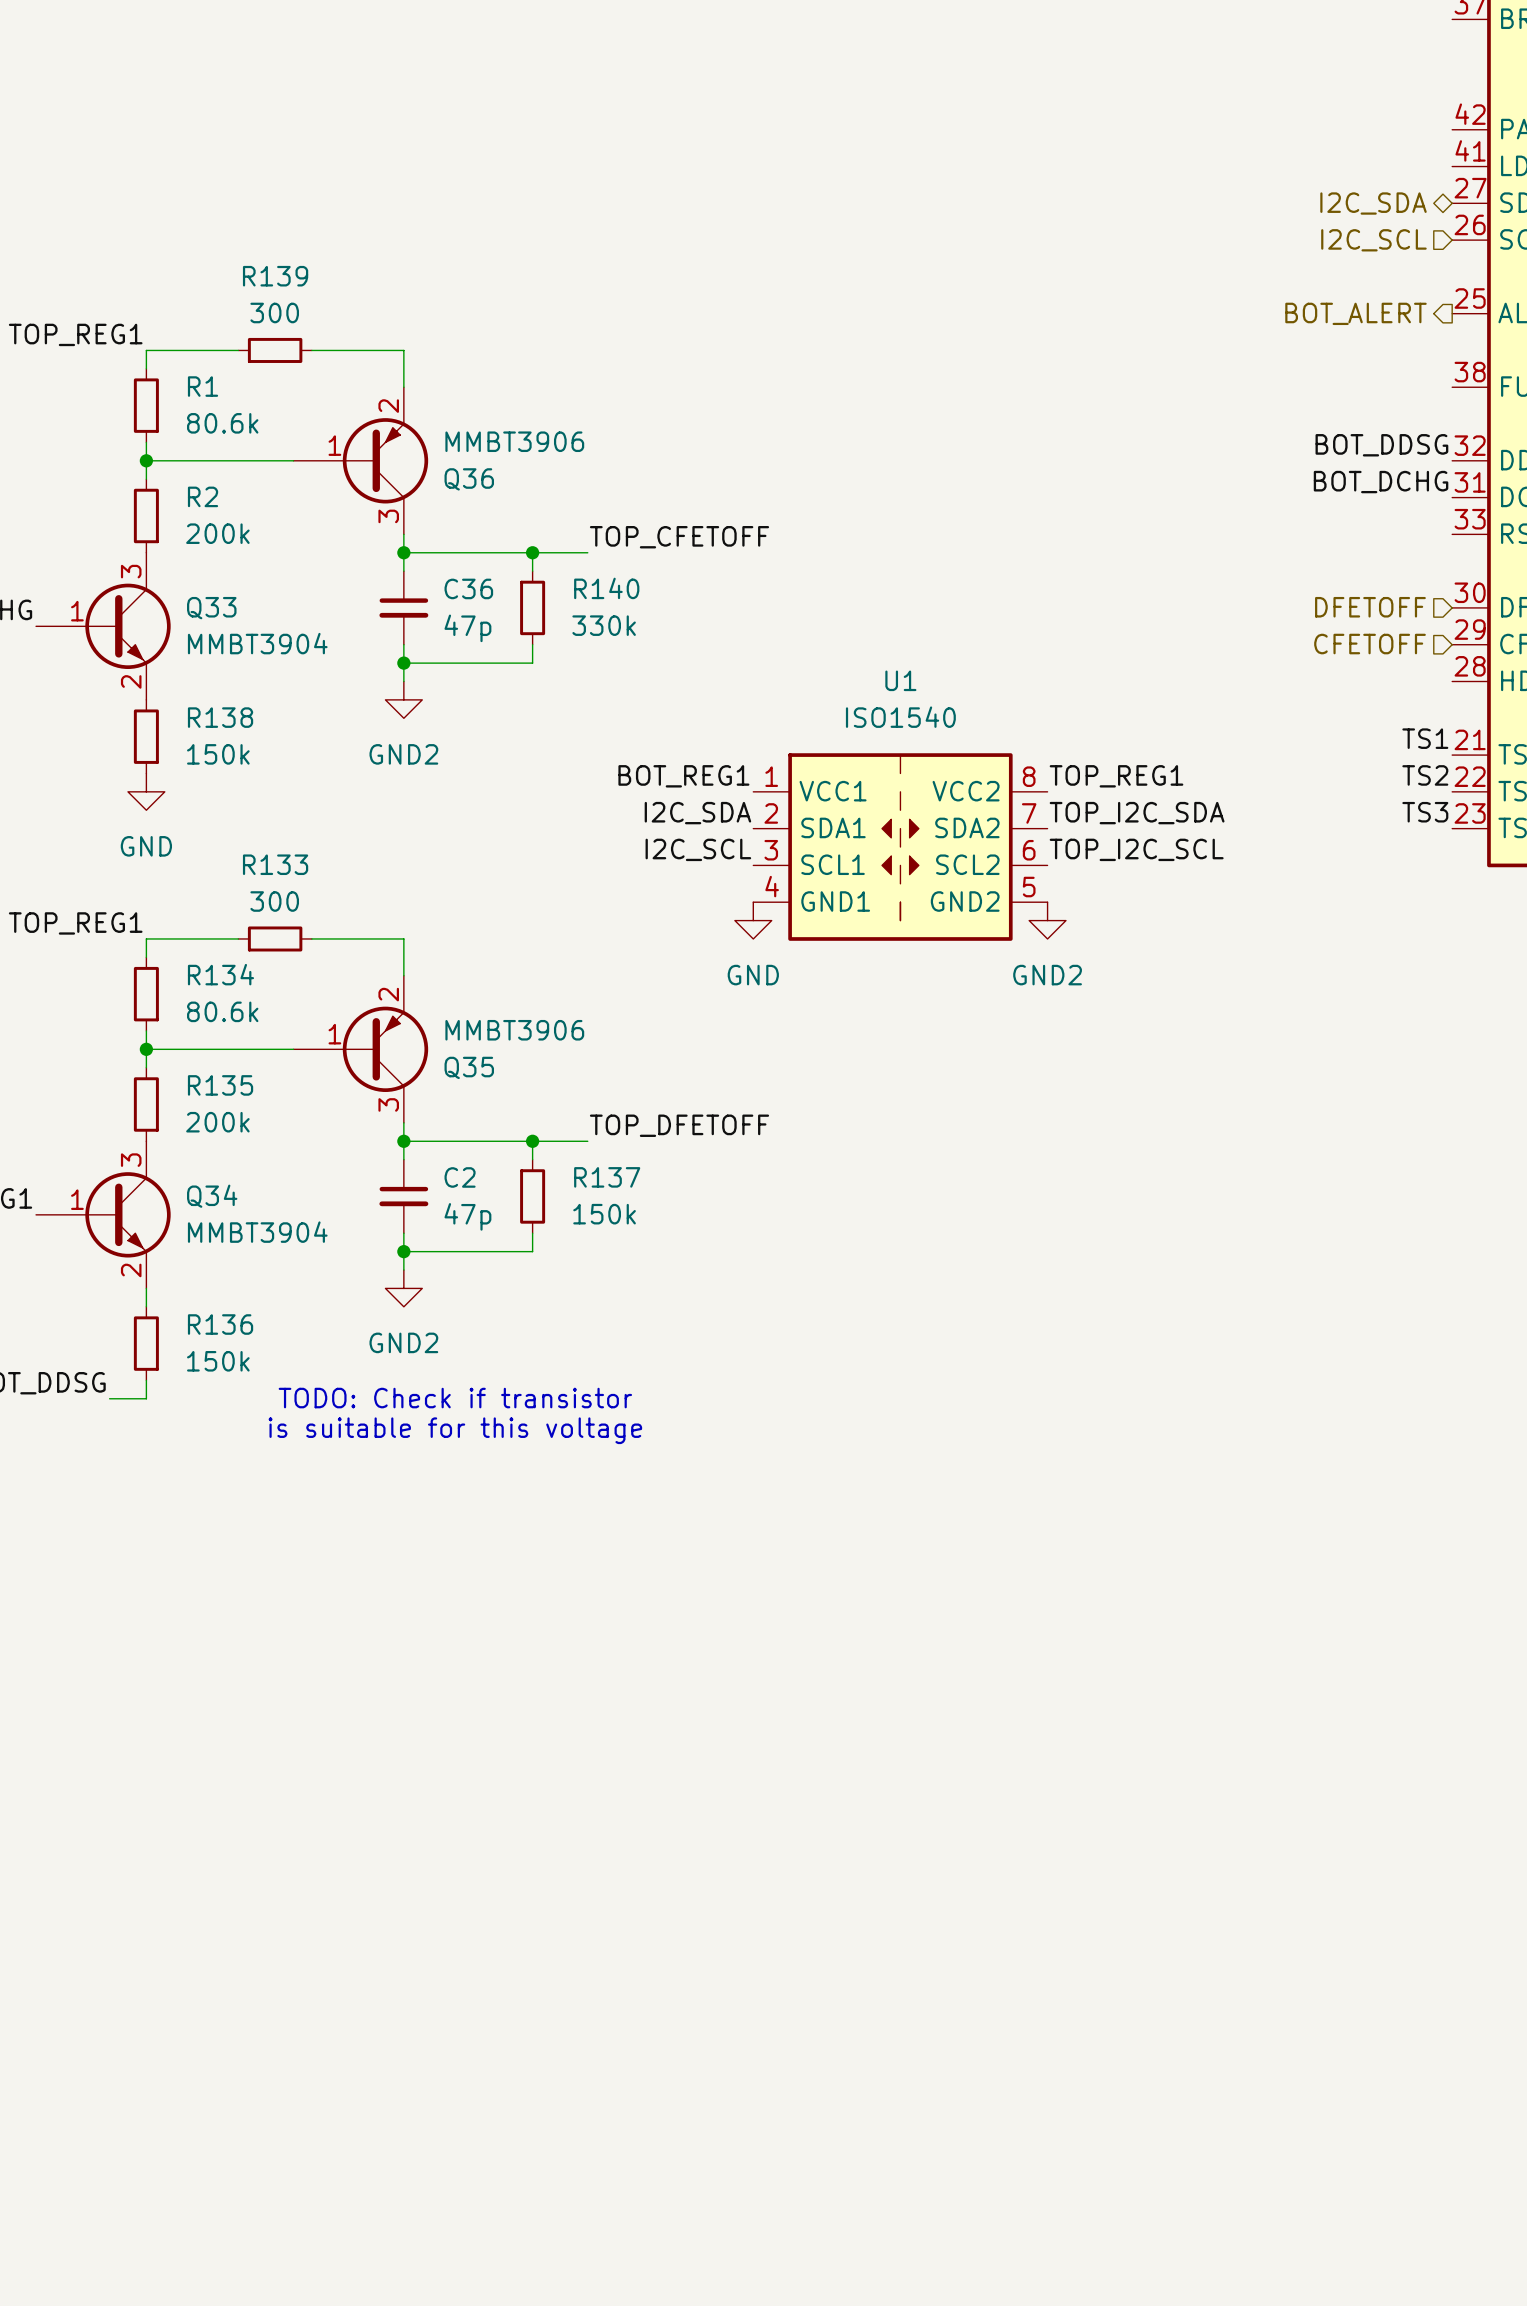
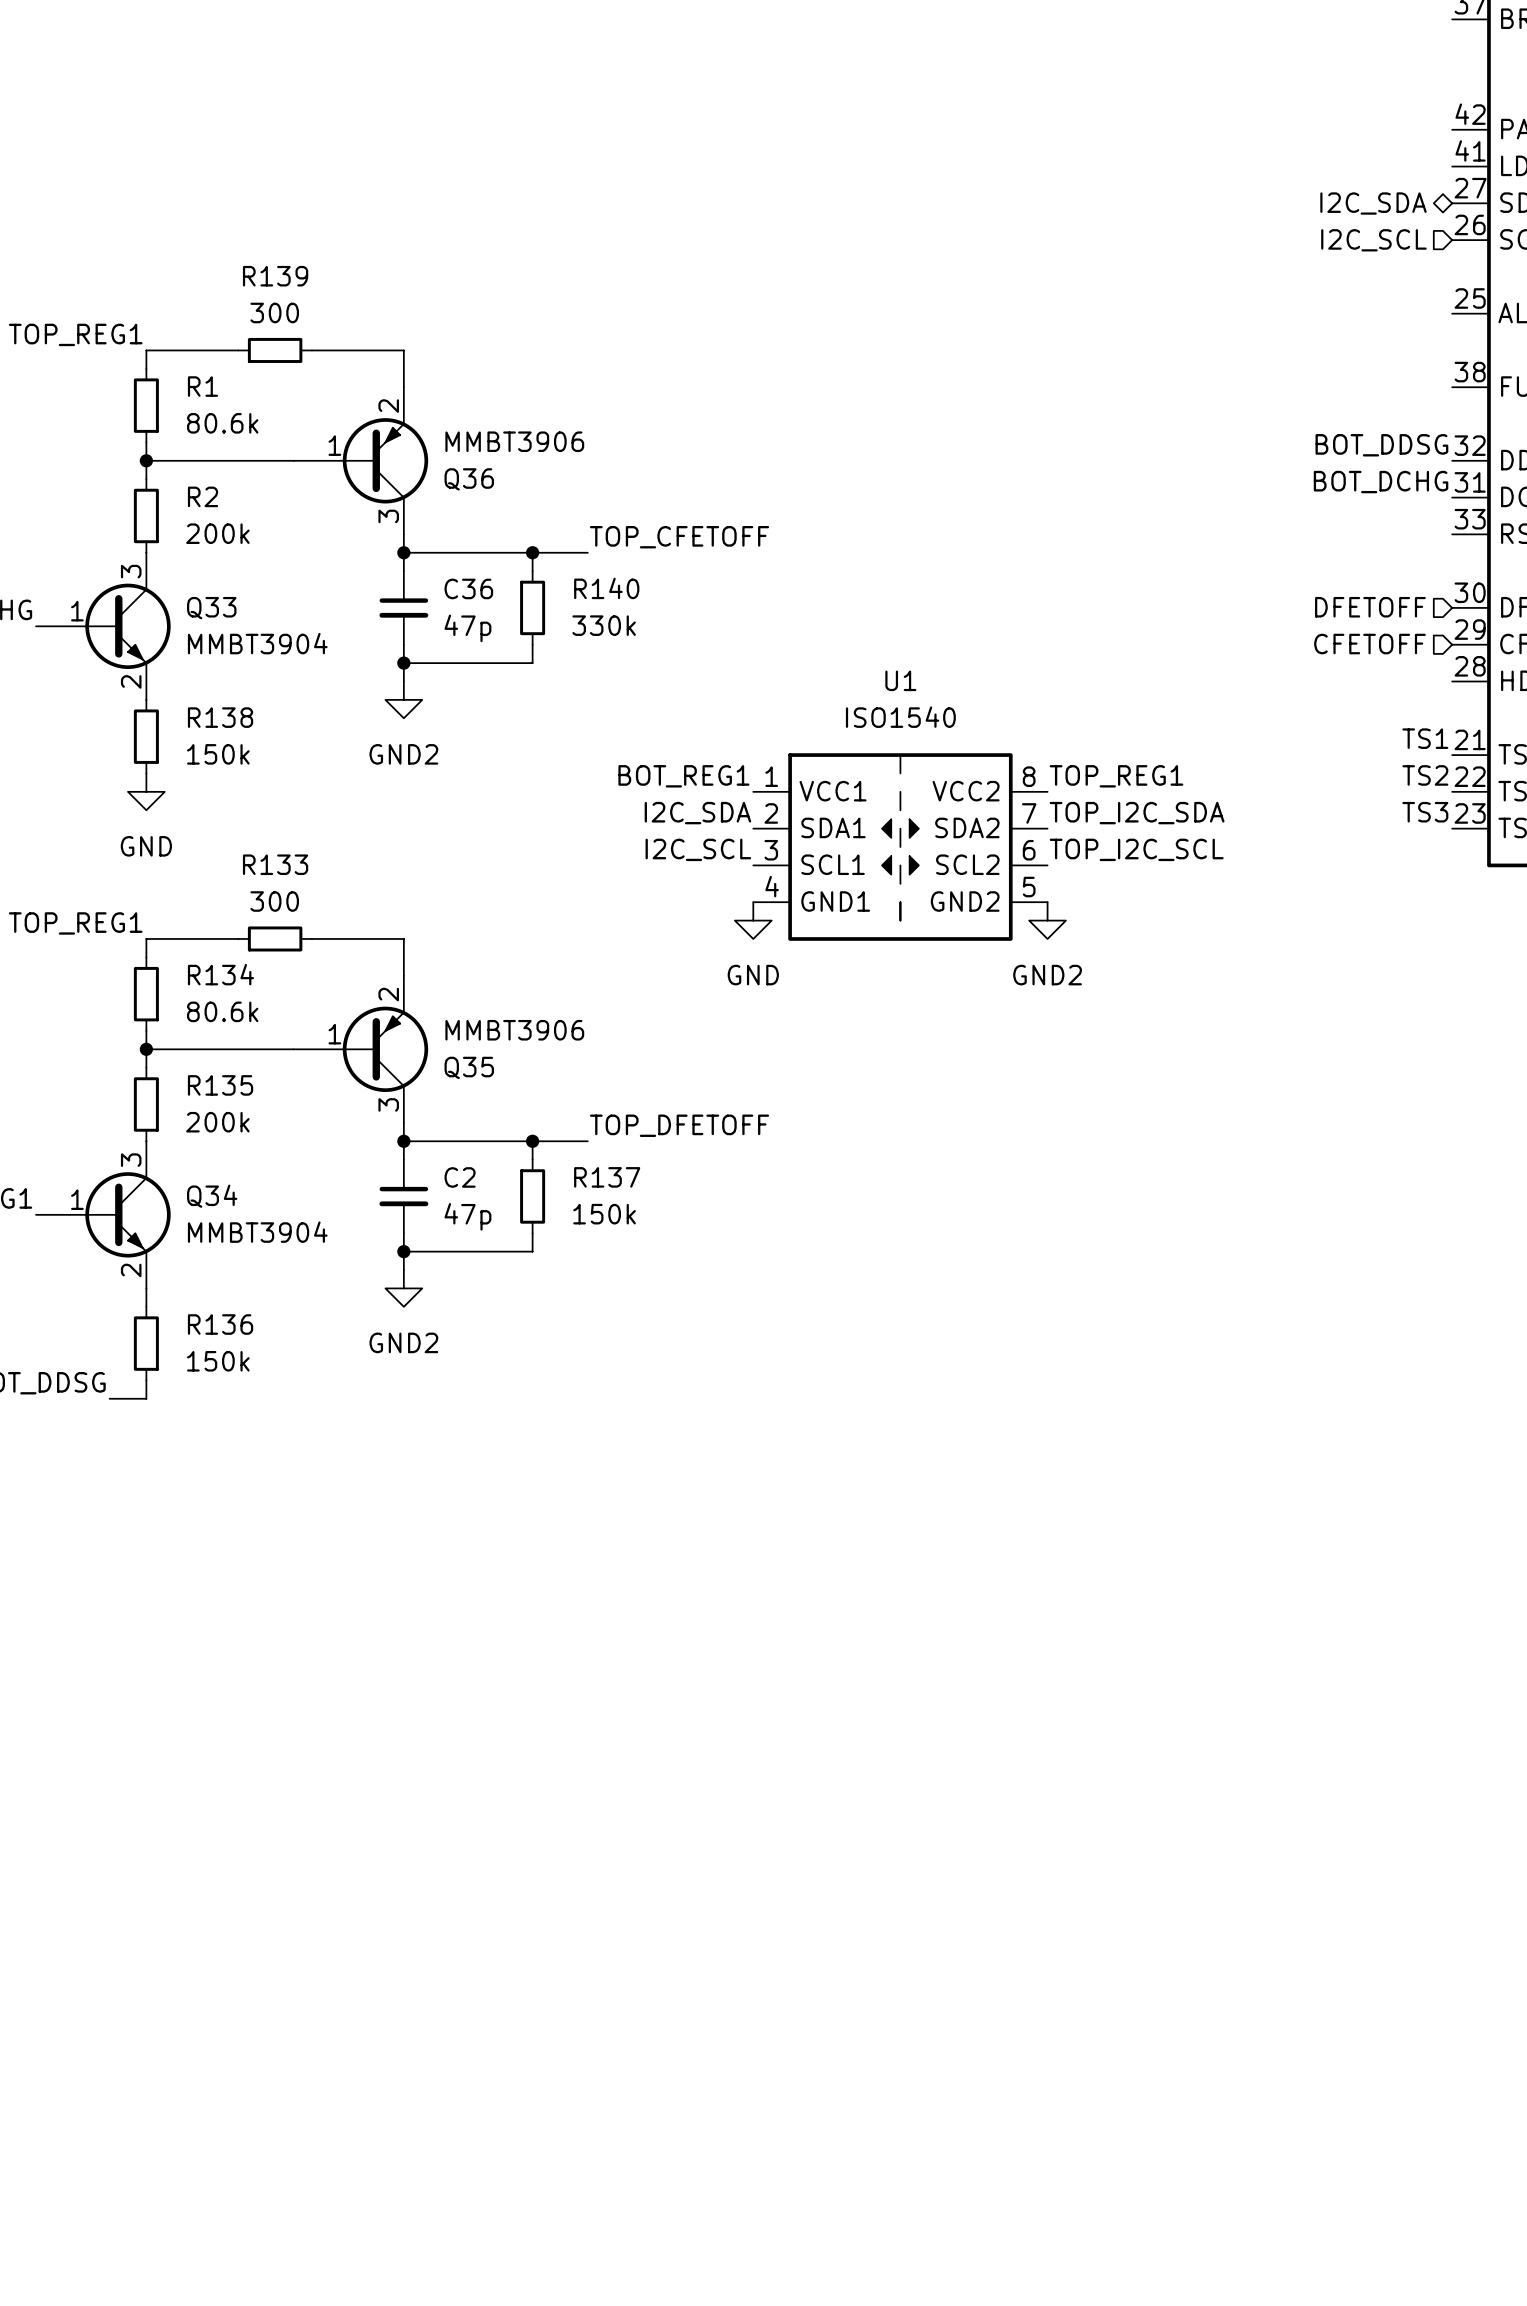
hierarchical label: BOT_ALERT (1355, 313) -> none
text: TODO: Check if transistor (455, 1398) -> none
text: is suitable for this voltage (455, 1430) -> none

